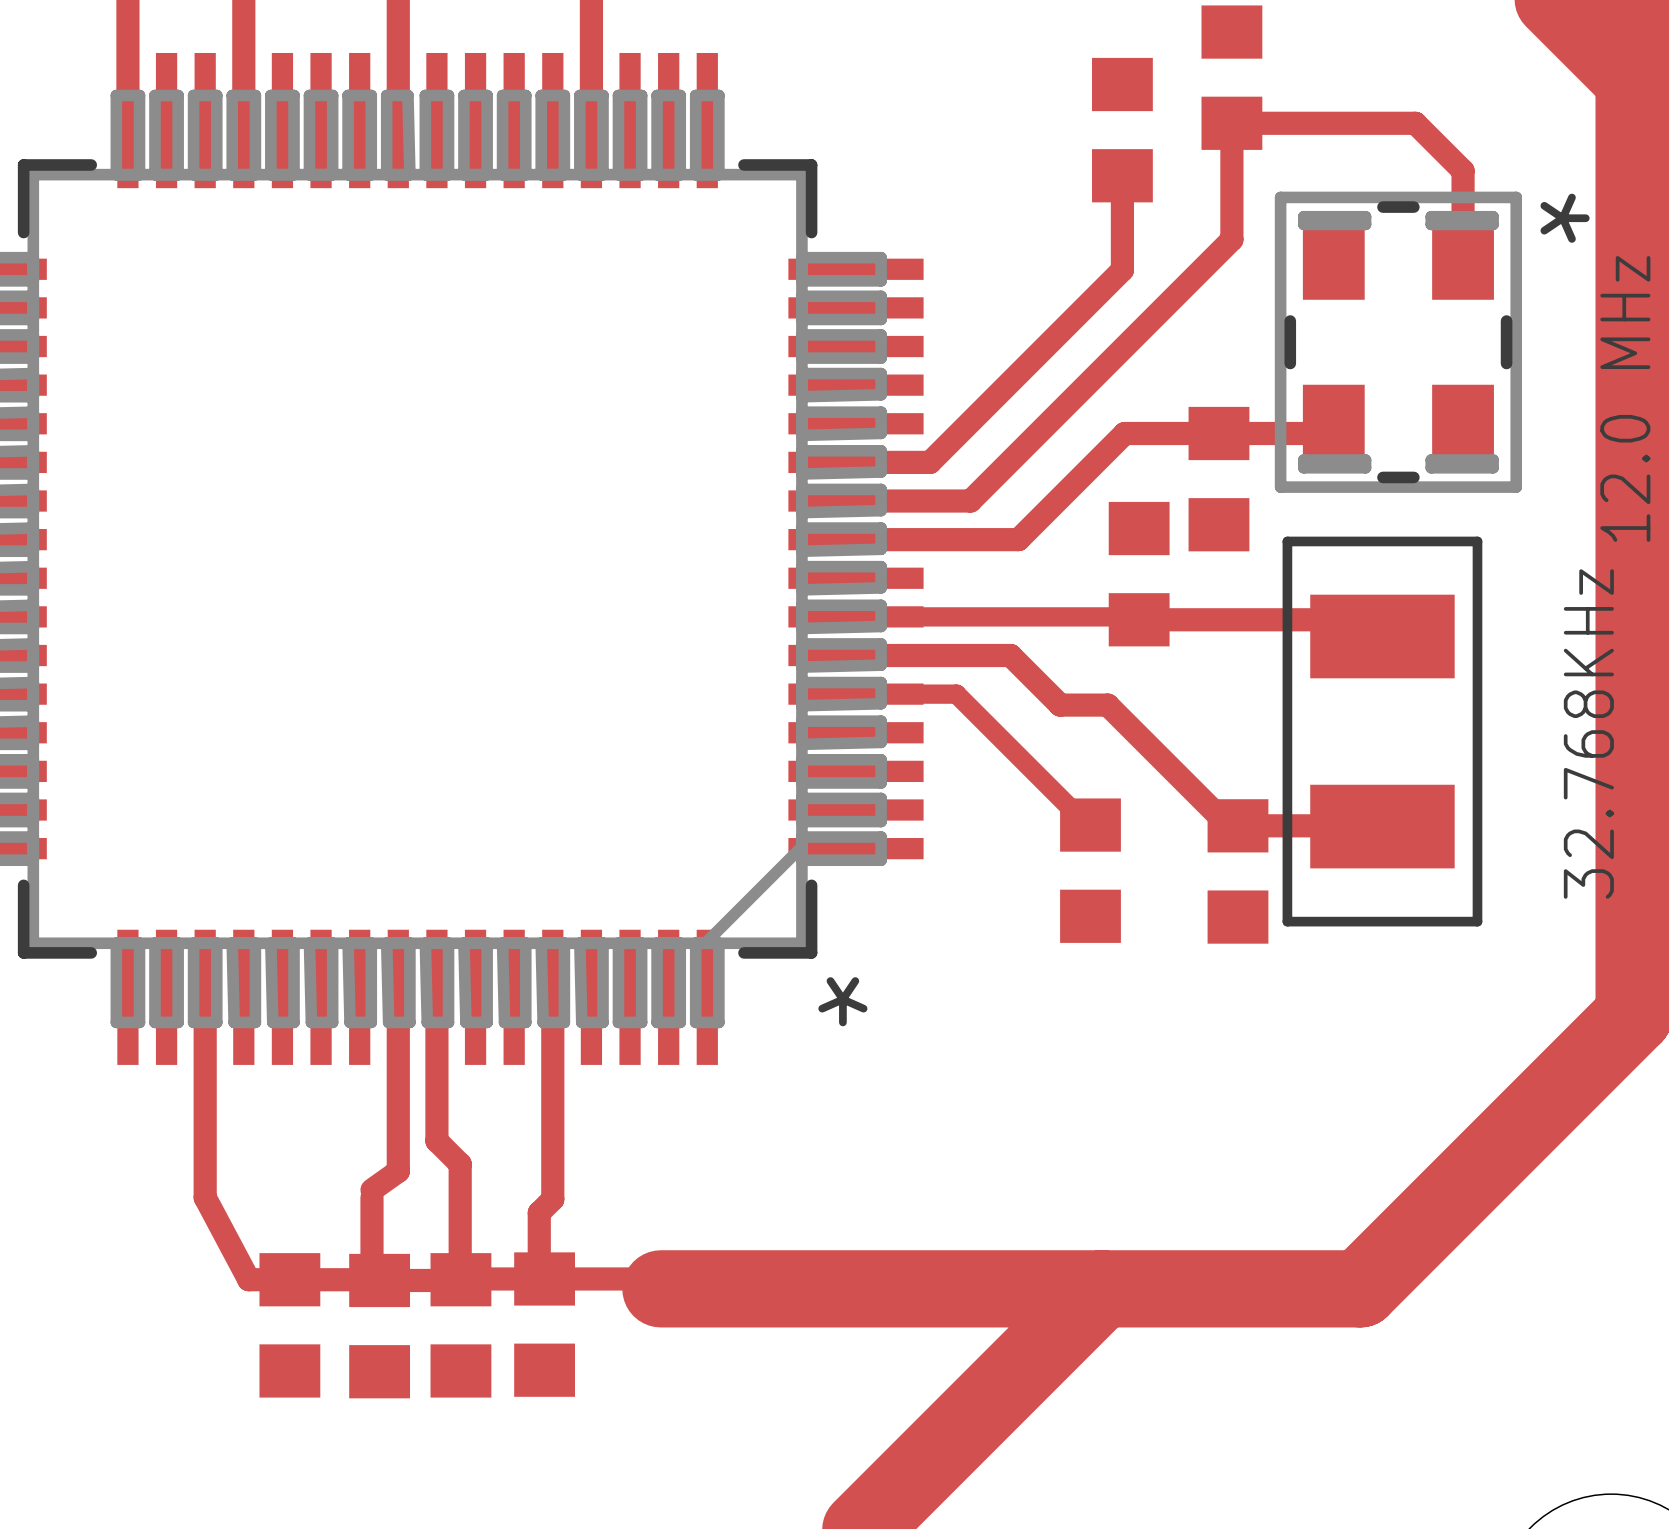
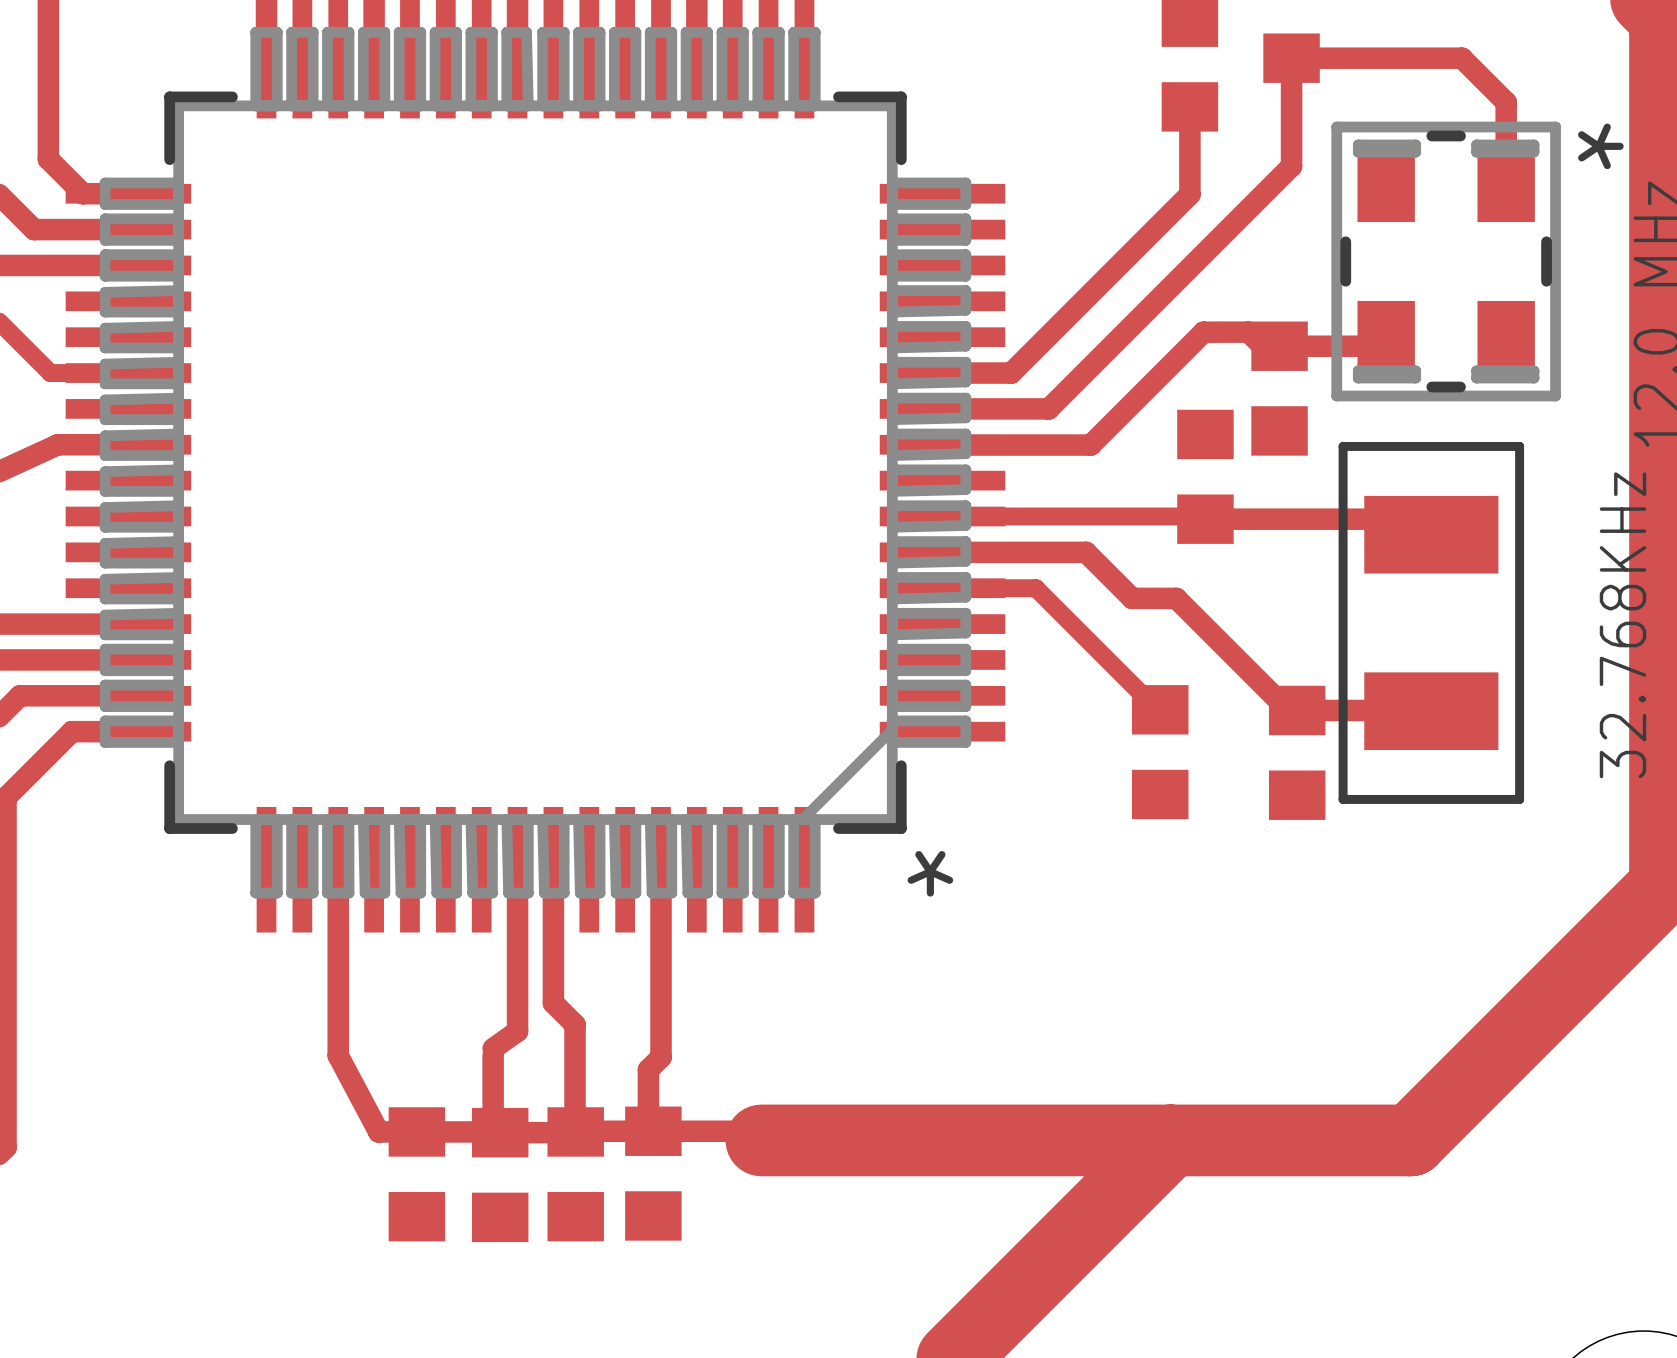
track: (1200, 433) (1124, 433) (1018, 539) (1015, 539) -> (1262, 346) (1248, 332) (1203, 332) (1090, 445)

